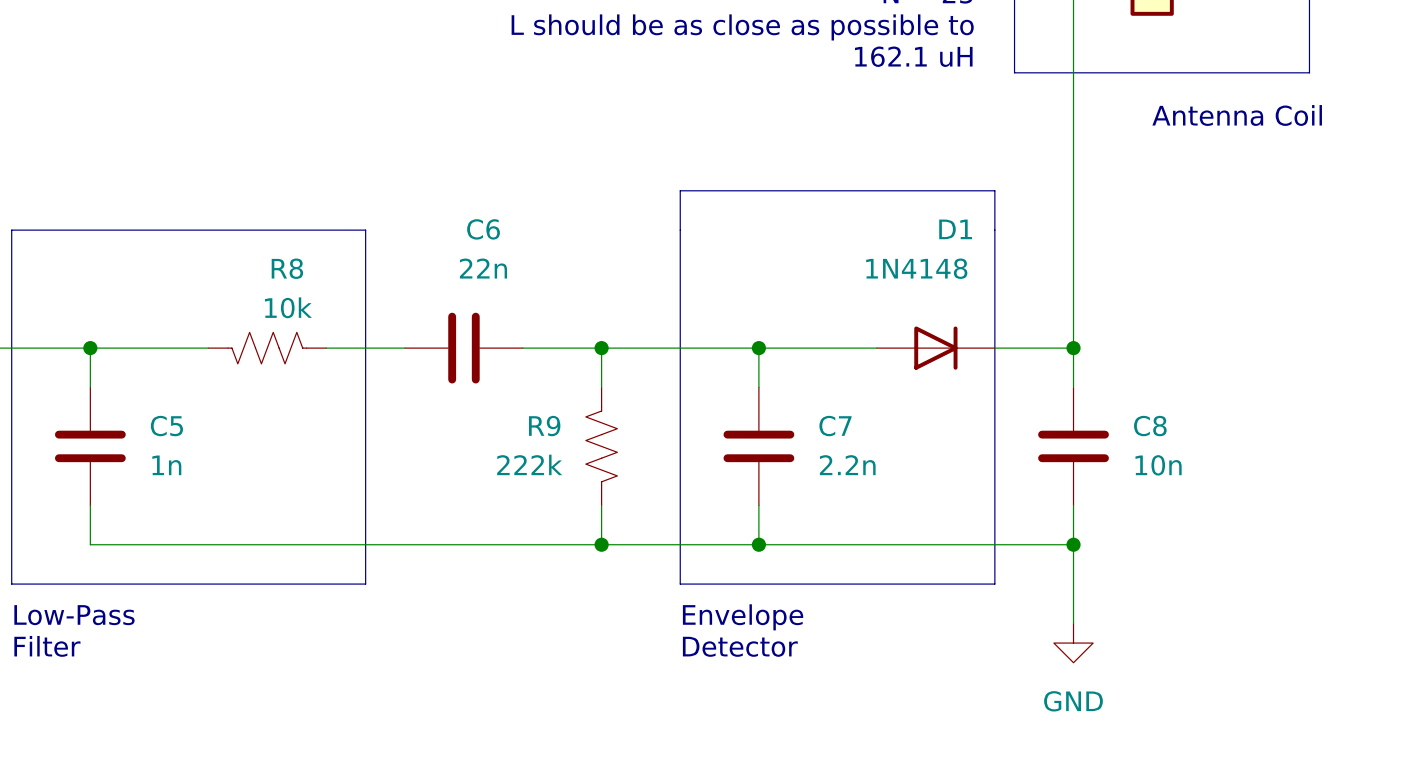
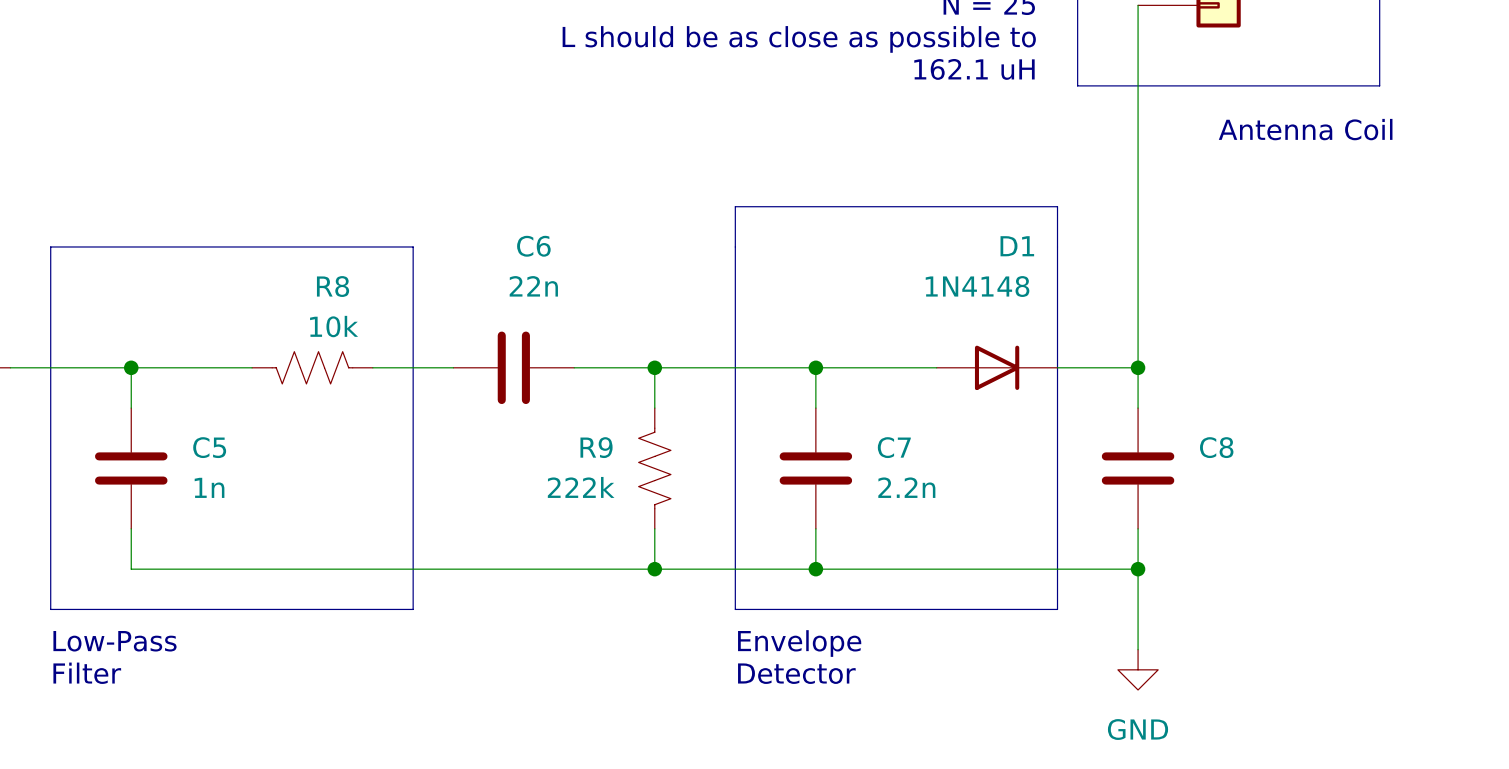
C8 value: 10n (1158, 465) -> none

